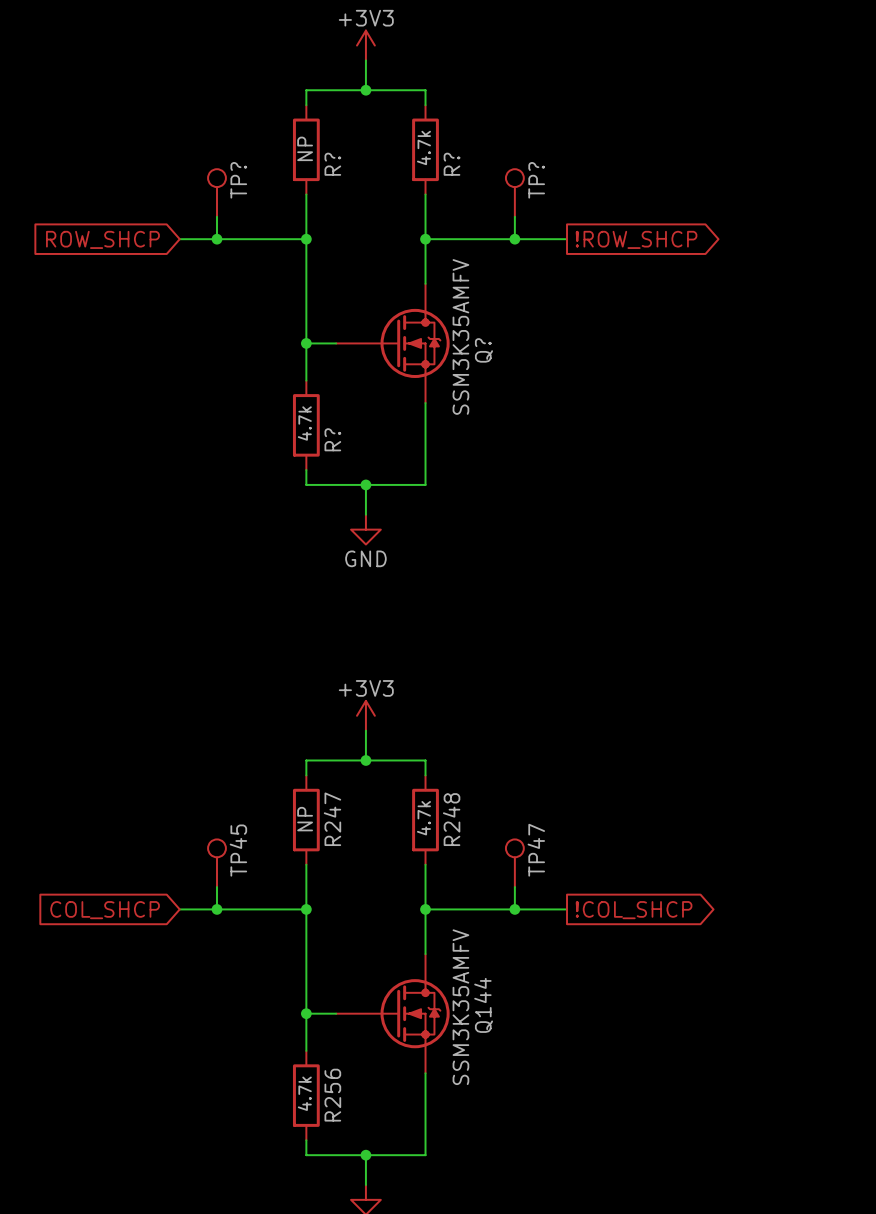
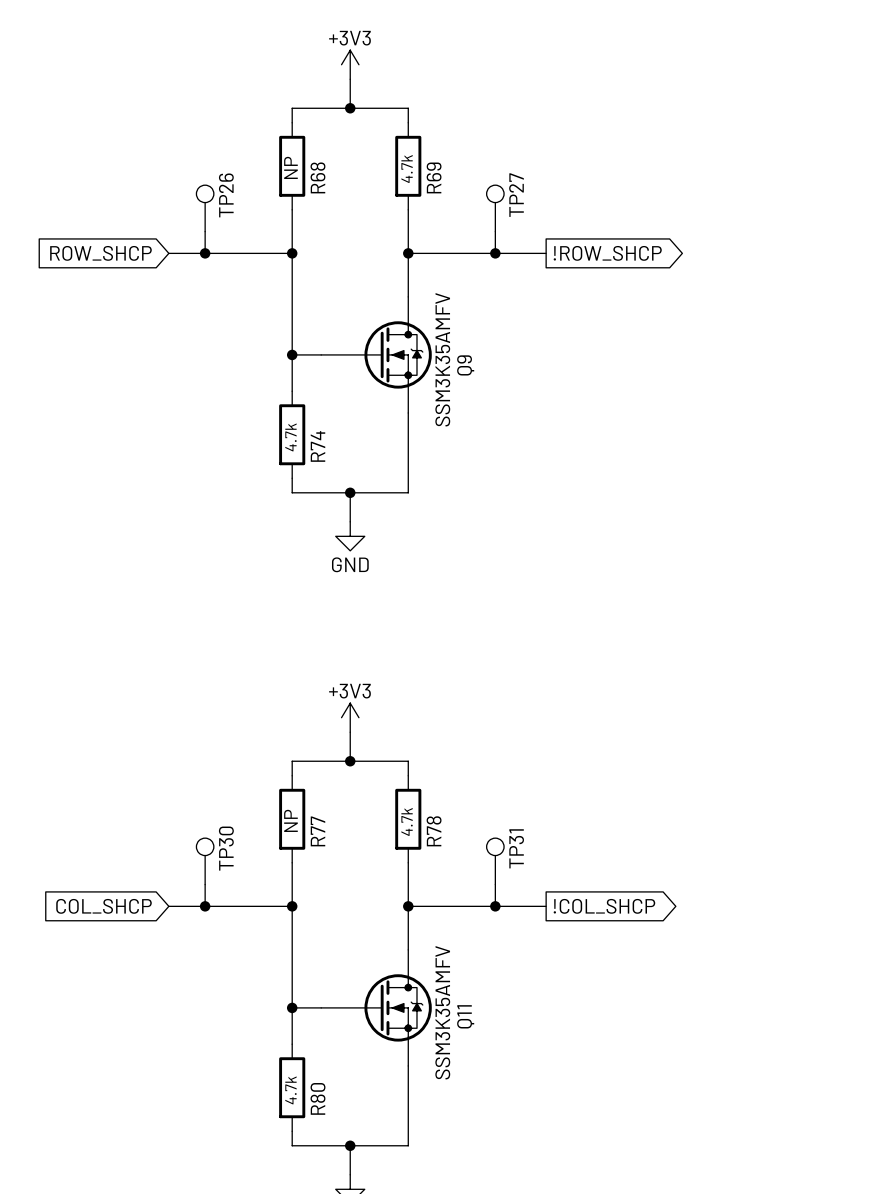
R? name: R? (332, 164) -> R68 (317, 177)
R? name: R? (451, 164) -> R69 (434, 177)
TP? name: TP? (238, 180) -> TP26 (226, 195)
TP? name: TP? (536, 180) -> TP27 (516, 195)
Q? name: Q? (483, 350) -> Q9 (465, 365)
R? name: R? (332, 439) -> R74 (317, 446)
R247 name: R247 (332, 819) -> R77 (317, 831)
R248 name: R248 (451, 819) -> R78 (434, 831)
TP45 name: TP45 (238, 850) -> TP30 (226, 848)
TP47 name: TP47 (536, 850) -> TP31 (516, 848)
Q144 name: Q144 (483, 1005) -> Q11 (465, 1016)
R256 name: R256 (332, 1095) -> R80 (317, 1098)

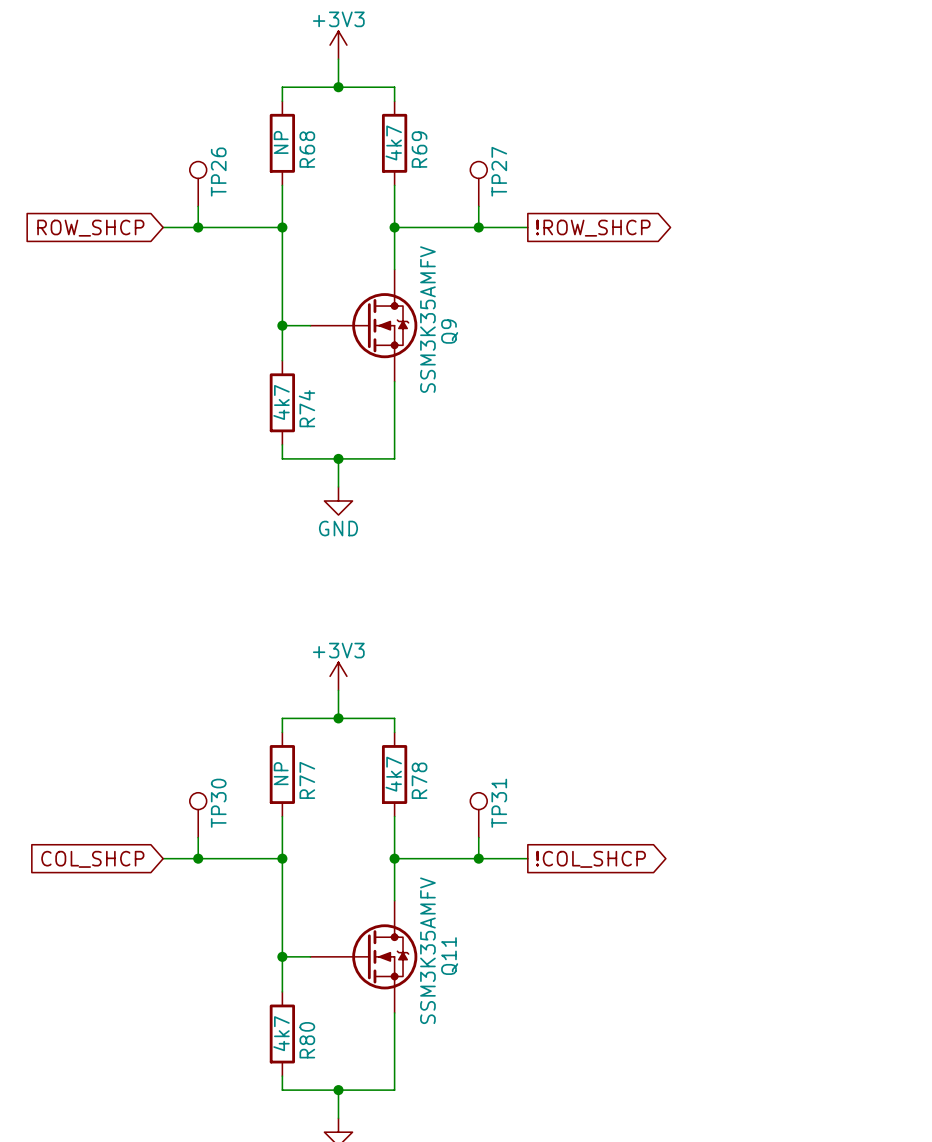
R69 text: none -> 4k7 (393, 142)
R69 text: 4.7k (407, 169) -> none
R74 text: none -> 4k7 (281, 402)
R74 text: 4.7k (290, 437) -> none
R78 text: none -> 4k7 (393, 774)
R78 text: 4.7k (407, 821) -> none
R80 text: none -> 4k7 (281, 1033)
R80 text: 4.7k (290, 1090) -> none

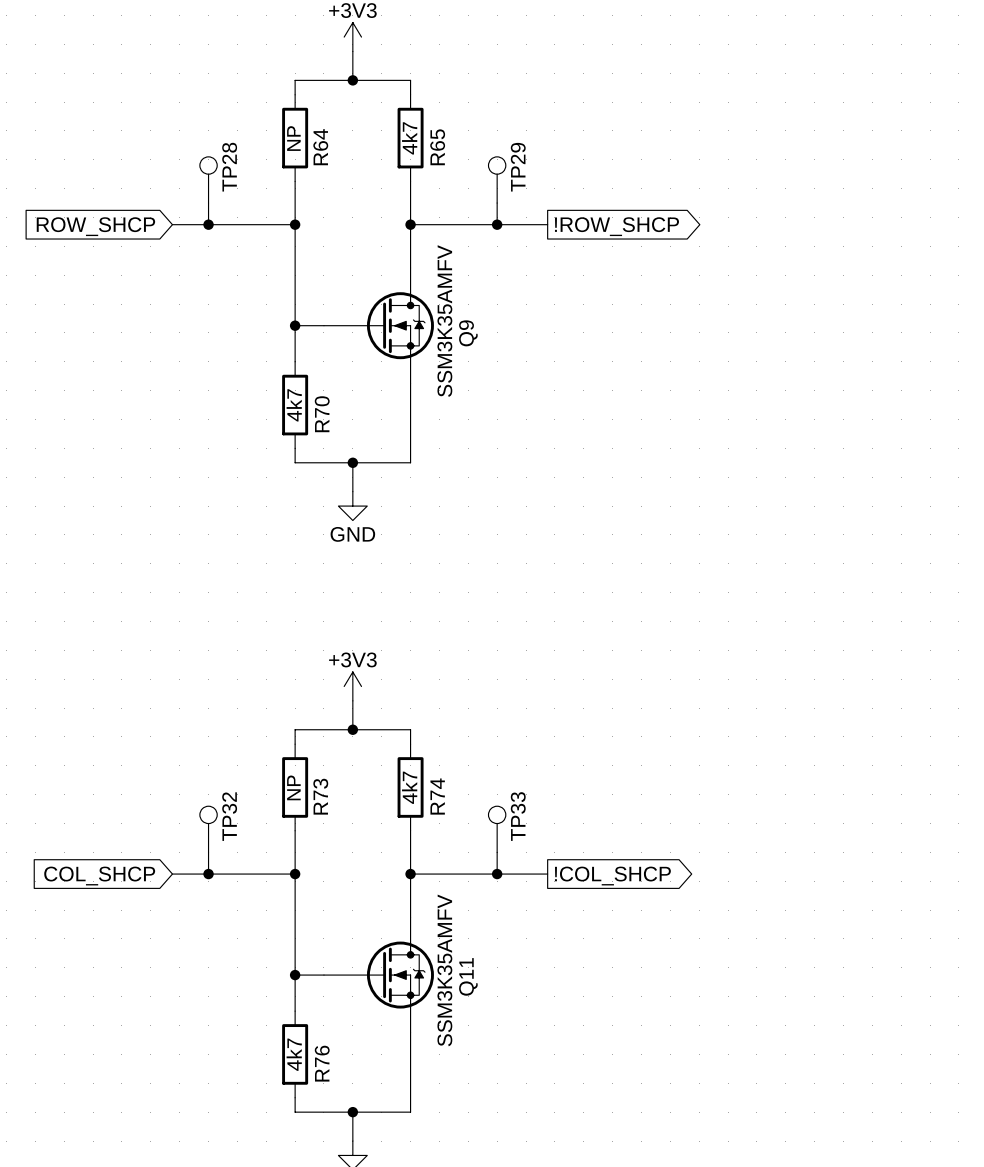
R68 name: R68 (307, 149) -> R64 (320, 147)
R69 name: R69 (419, 149) -> R65 (437, 147)
TP27 name: TP27 (499, 171) -> TP29 (518, 167)
TP26 name: TP26 (218, 172) -> TP28 (229, 167)
R74 name: R74 (306, 408) -> R70 (322, 414)
R77 name: R77 (307, 780) -> R73 (320, 796)
R78 name: R78 (419, 780) -> R74 (437, 796)
TP30 name: TP30 (218, 803) -> TP32 (229, 816)
TP31 name: TP31 (499, 803) -> TP33 (518, 816)
R80 name: R80 (307, 1040) -> R76 (322, 1063)

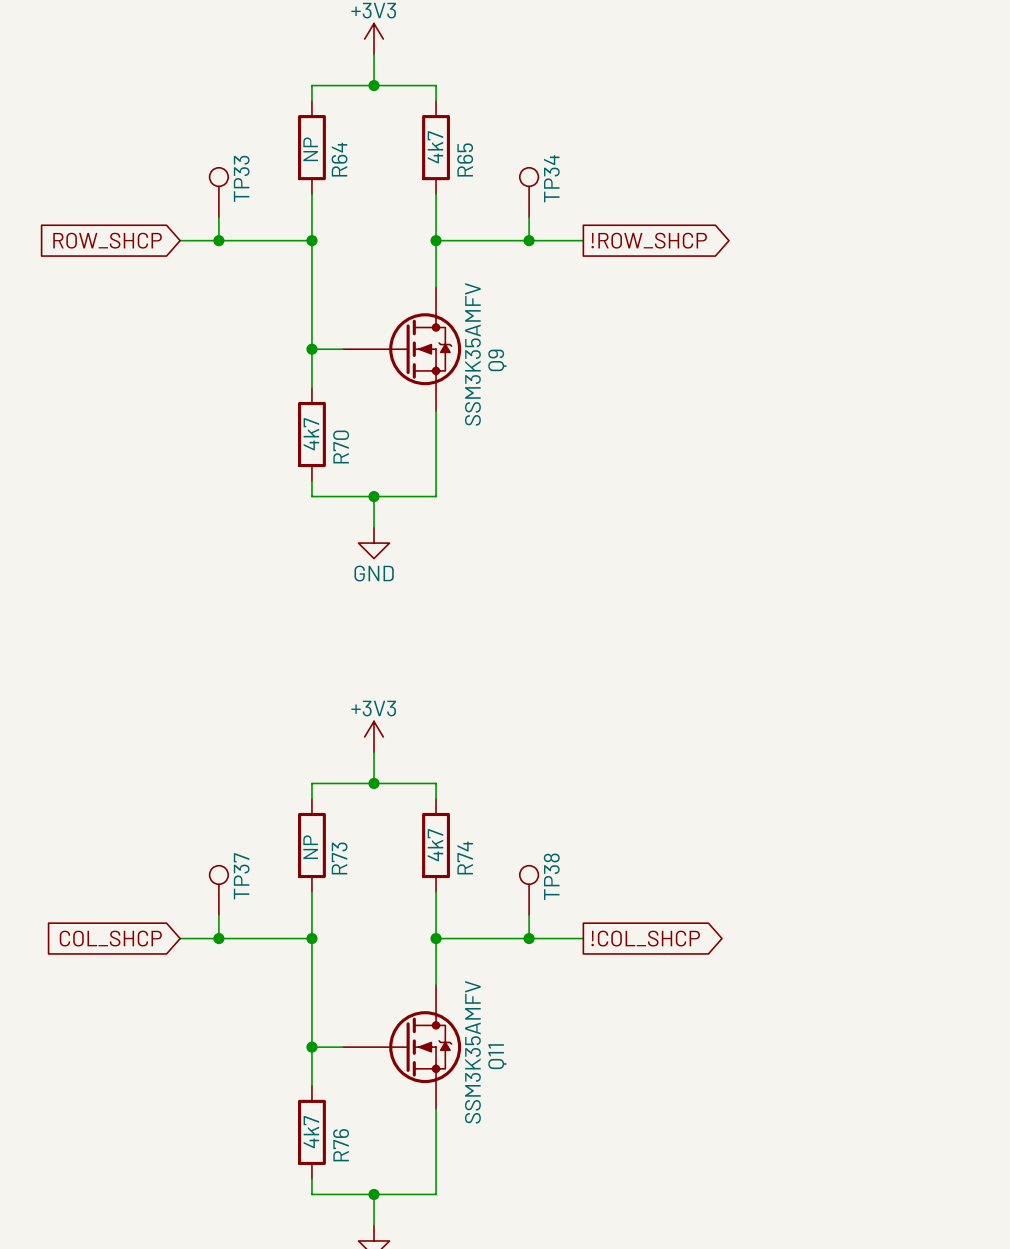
TP28 name: TP28 (229, 167) -> TP33 (241, 178)
TP29 name: TP29 (518, 167) -> TP34 (551, 178)
TP32 name: TP32 (229, 816) -> TP37 (241, 876)
TP33 name: TP33 (518, 816) -> TP38 (551, 876)

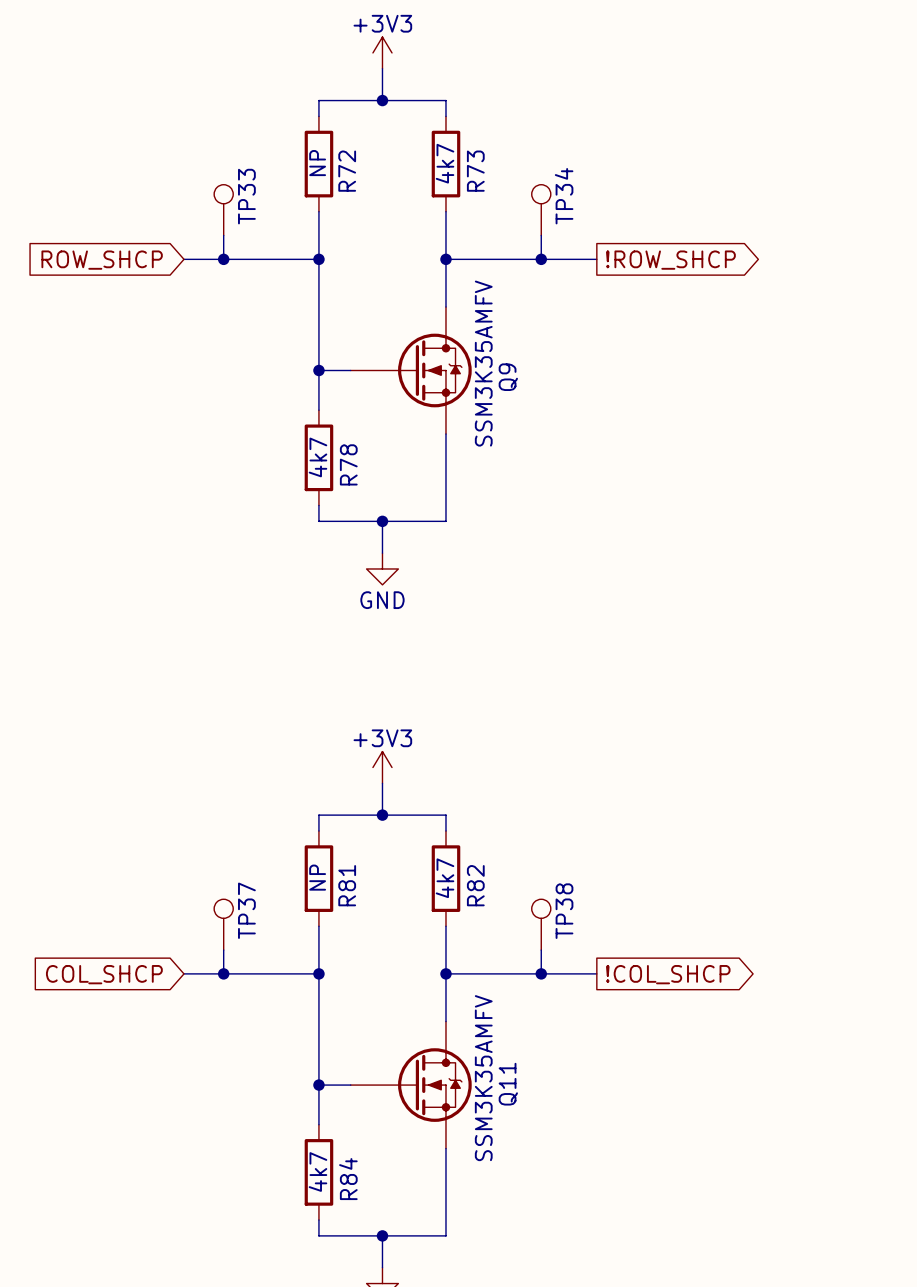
R64 name: R64 (339, 159) -> R72 (347, 171)
R65 name: R65 (465, 159) -> R73 (475, 171)
R70 name: R70 (341, 447) -> R78 (348, 464)
R73 name: R73 (339, 858) -> R81 (347, 885)
R74 name: R74 (465, 858) -> R82 (475, 885)
R76 name: R76 (341, 1145) -> R84 (348, 1179)

